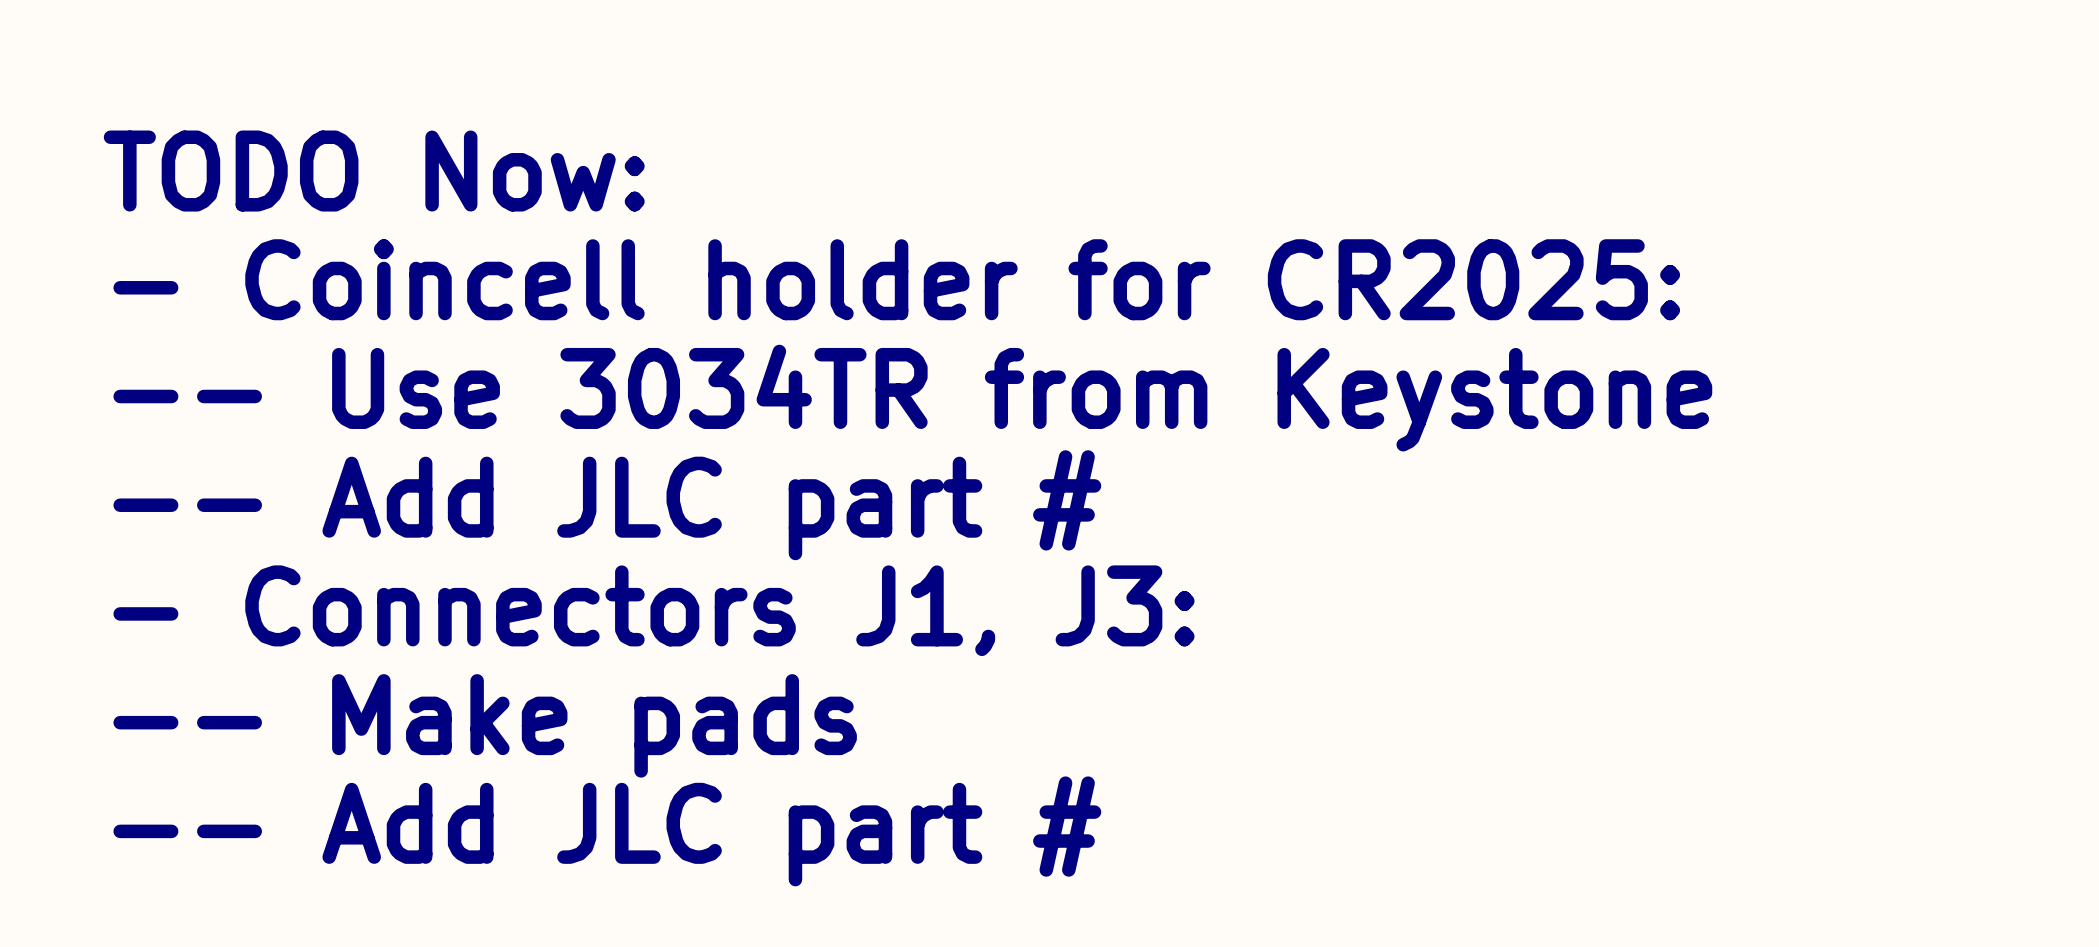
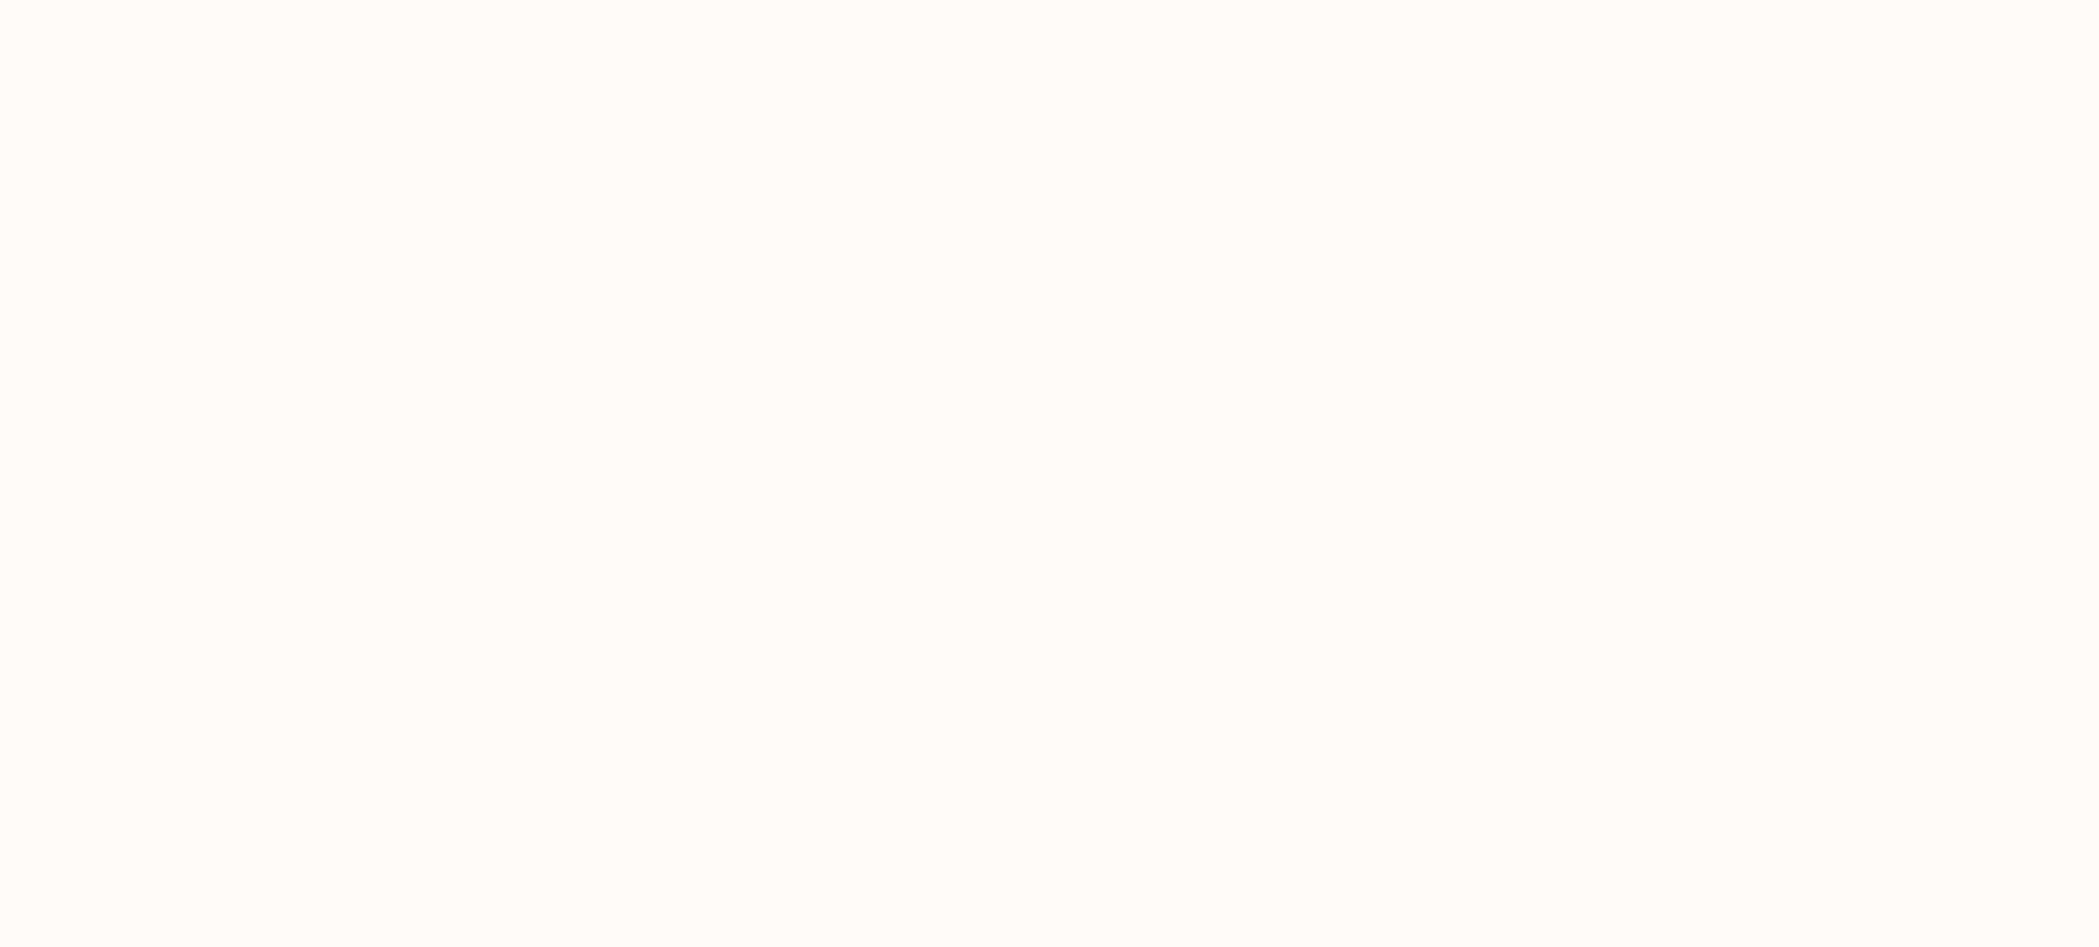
text: TODO Now: (374, 171) -> none
text: - Coincell holder for CR2025: (896, 279) -> none
text: -- Use 3034TR from Keystone (912, 398) -> none
text: -- Add JLC part # (607, 505) -> none
text: - Connectors J1, J3: (653, 610) -> none
text: -- Make pads (485, 725) -> none
text: -- Add JLC part # (607, 831) -> none

